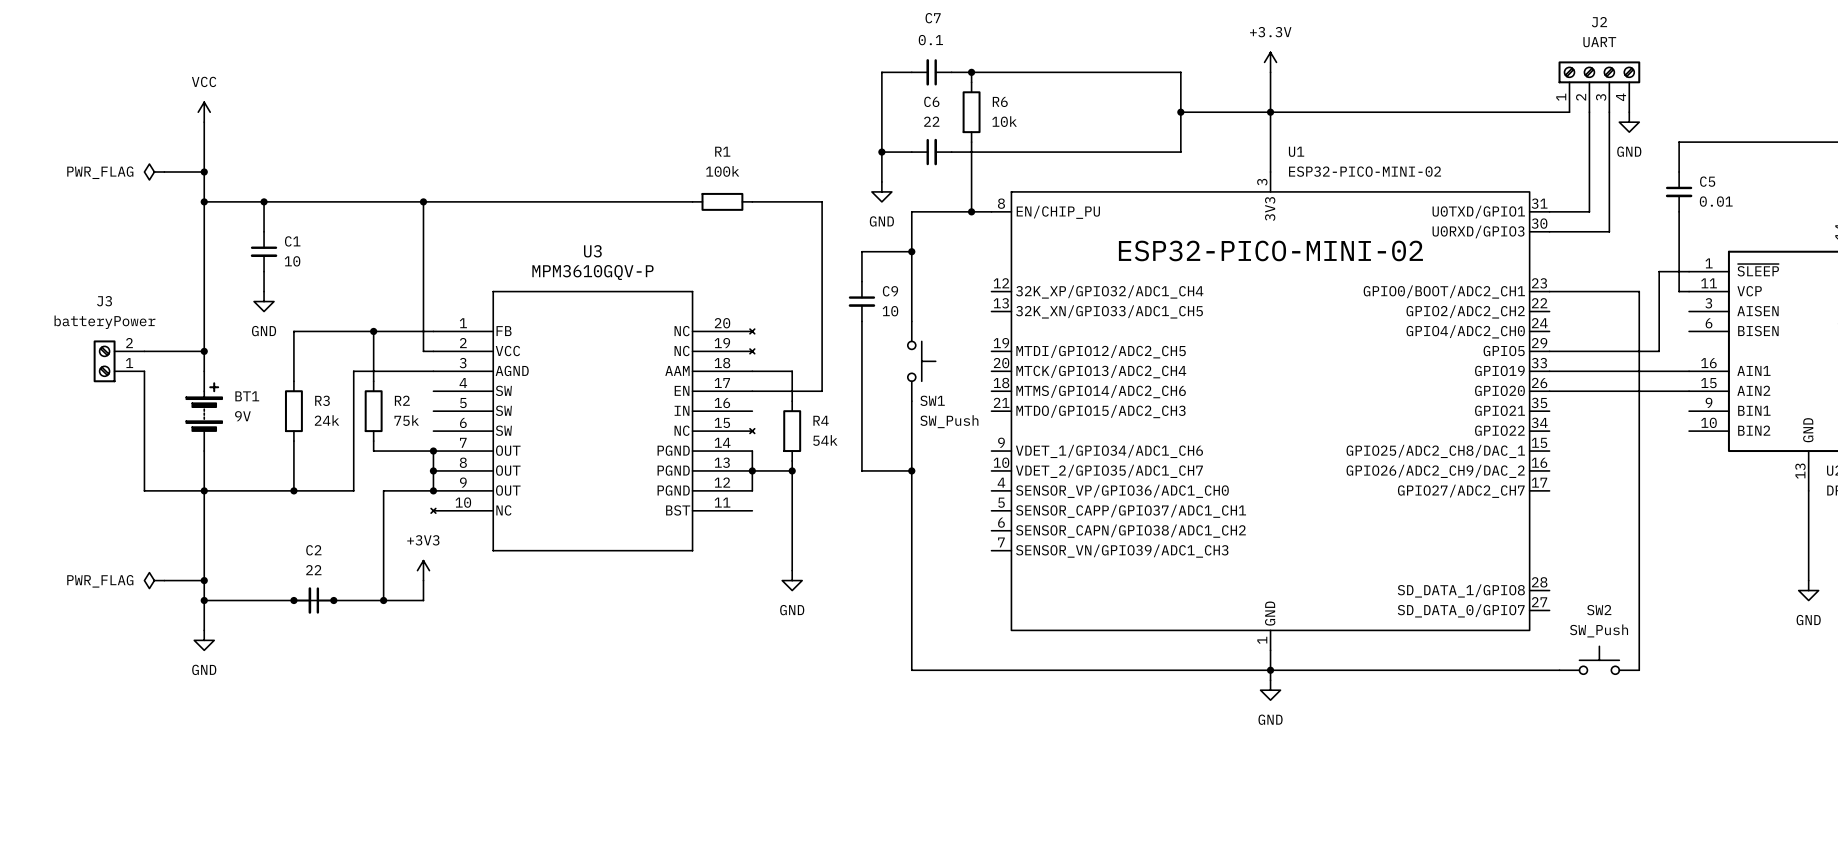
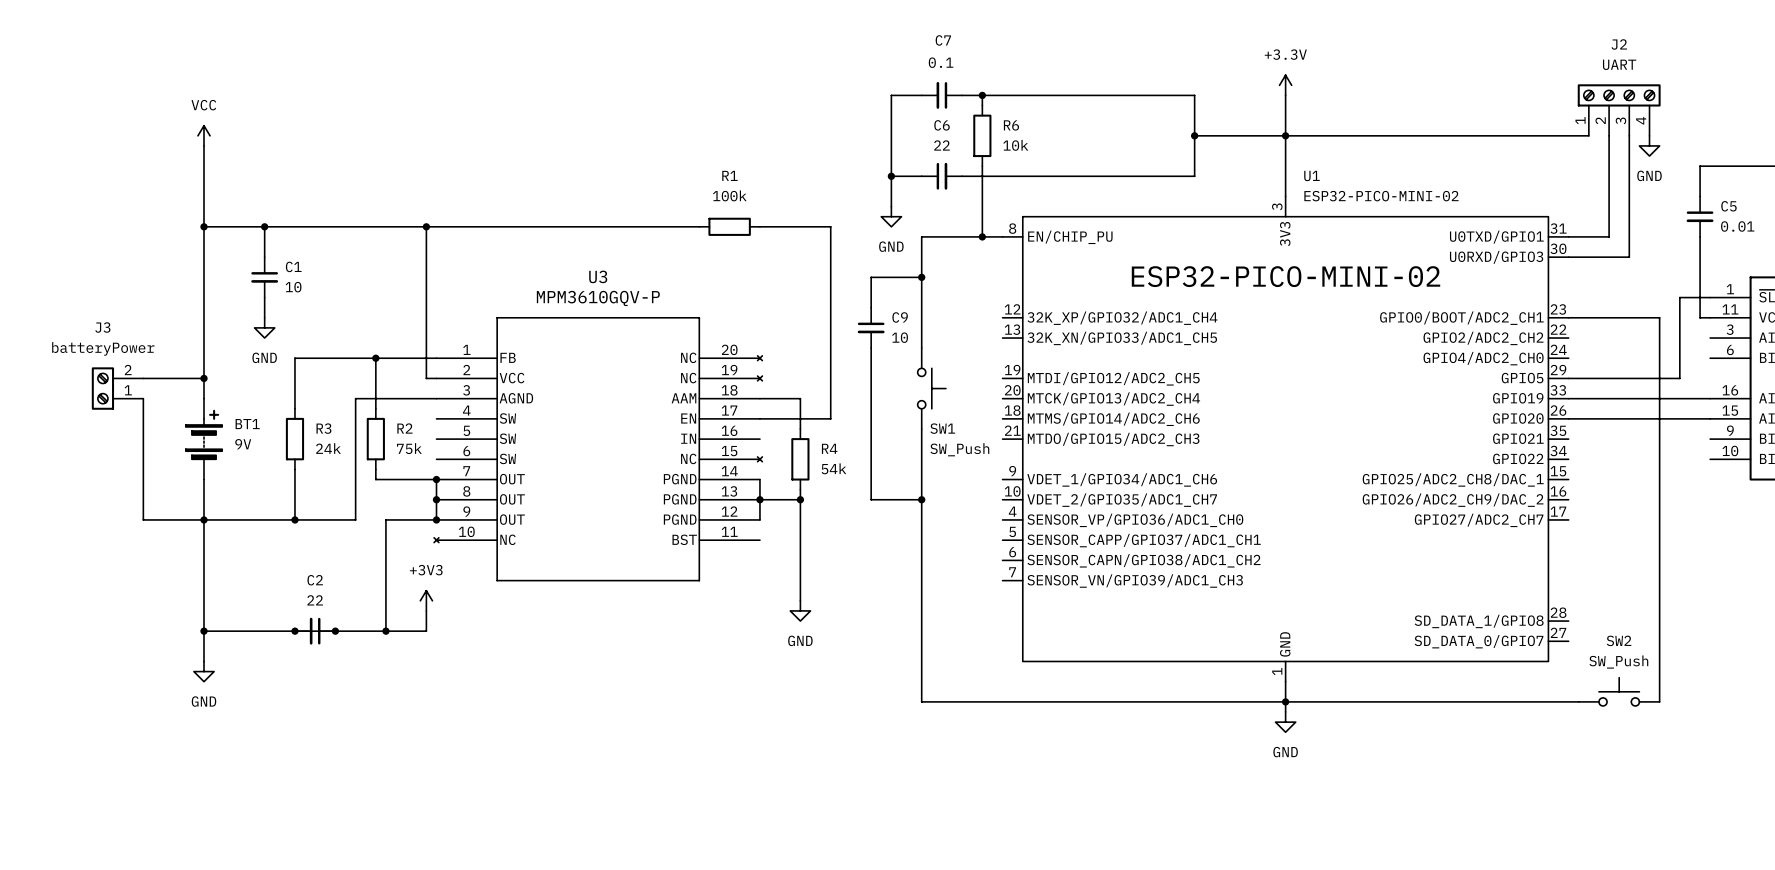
power symbol: PWR_FLAG (154, 172) -> none
wire: (164, 172) (204, 172) -> none
junction: (204, 172) -> none
power symbol: PWR_FLAG (154, 580) -> none
wire: (164, 580) (204, 580) -> none
junction: (204, 580) -> none

